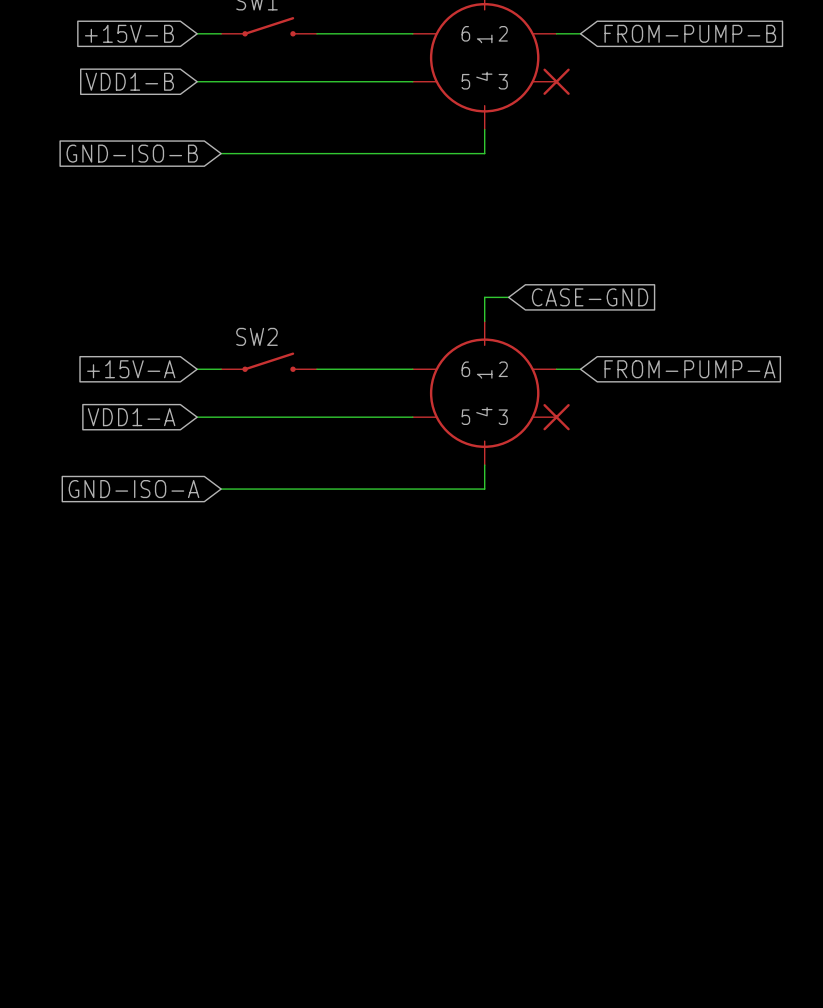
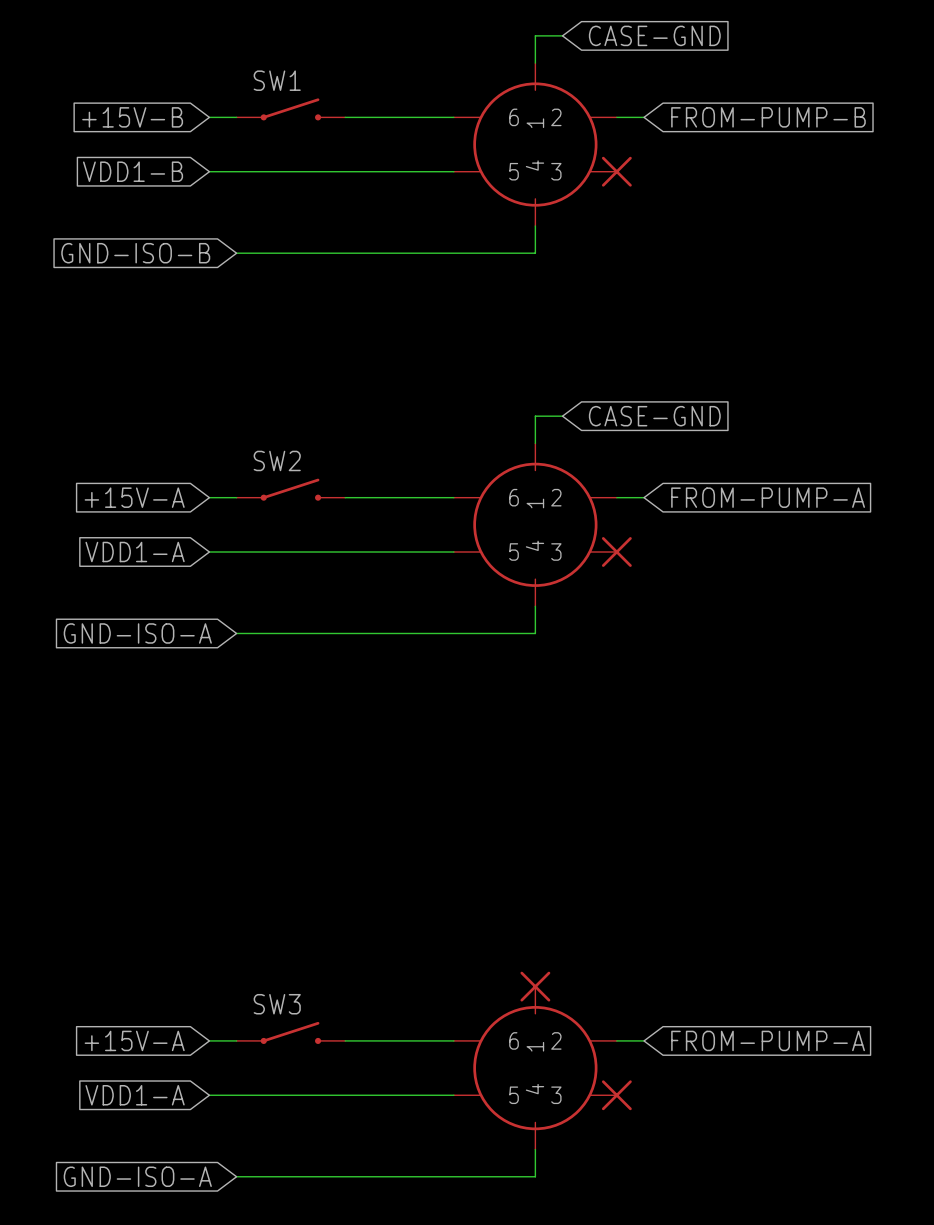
part: none -> (535, 986)
SW3: none -> (290, 1032)
global label: none -> +15V-A (134, 1040)
wire: none -> (209, 1040) (236, 1040)
wire: none -> (345, 1040) (453, 1040)
wire: none -> (616, 1040) (644, 1040)
global label: none -> FROM-PUMP-A (768, 1040)
part: none -> (535, 1068)
global label: none -> VDD1-A (135, 1095)
wire: none -> (209, 1095) (453, 1095)
part: none -> (616, 1095)
wire: none -> (535, 1149) (535, 1176) (236, 1176)
global label: none -> GND-ISO-A (137, 1176)

